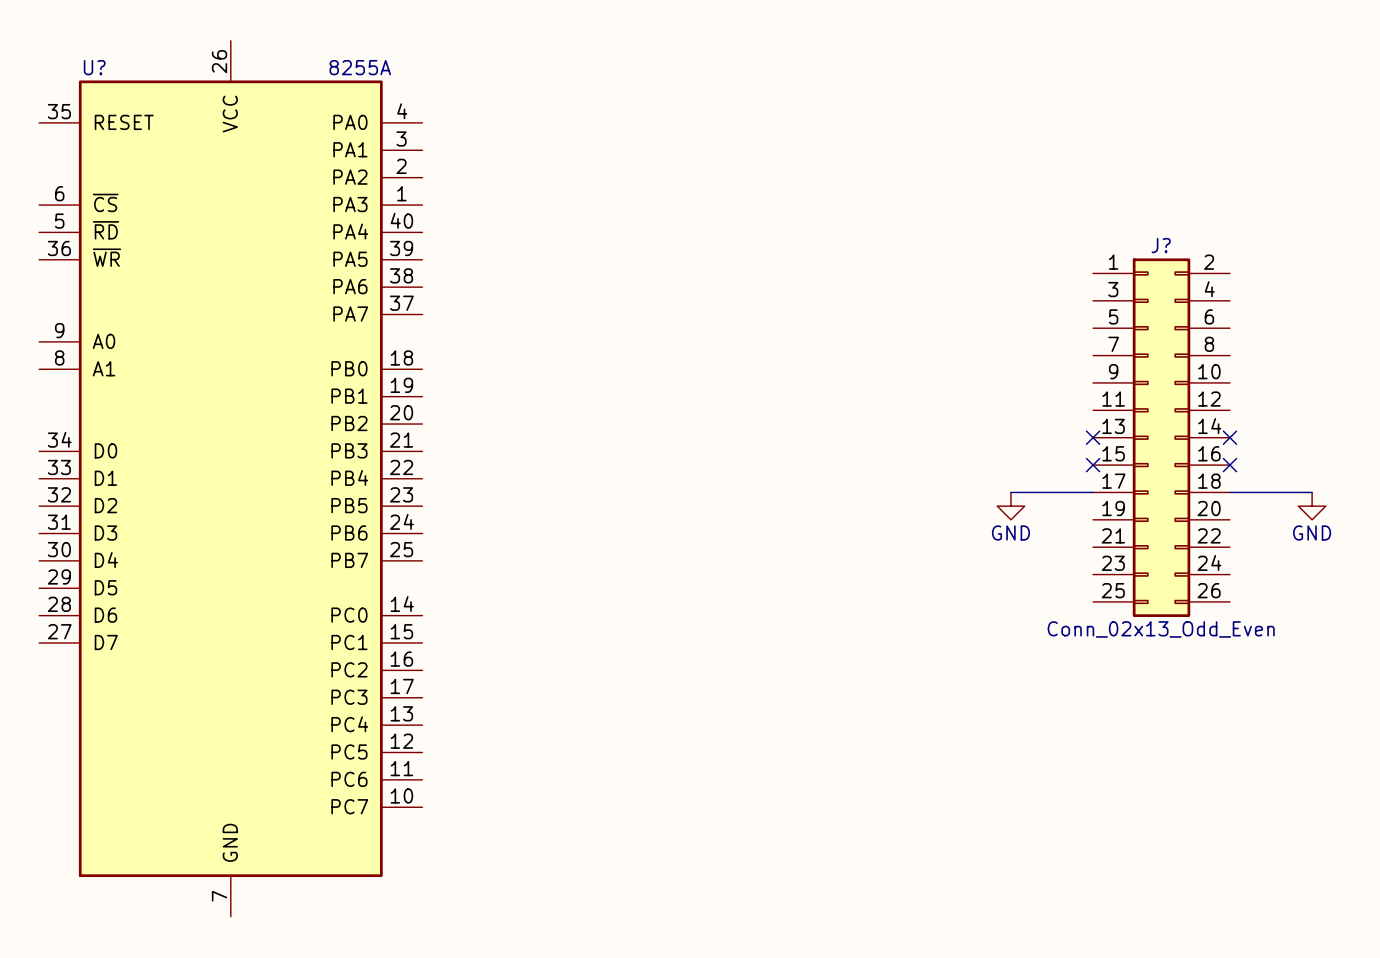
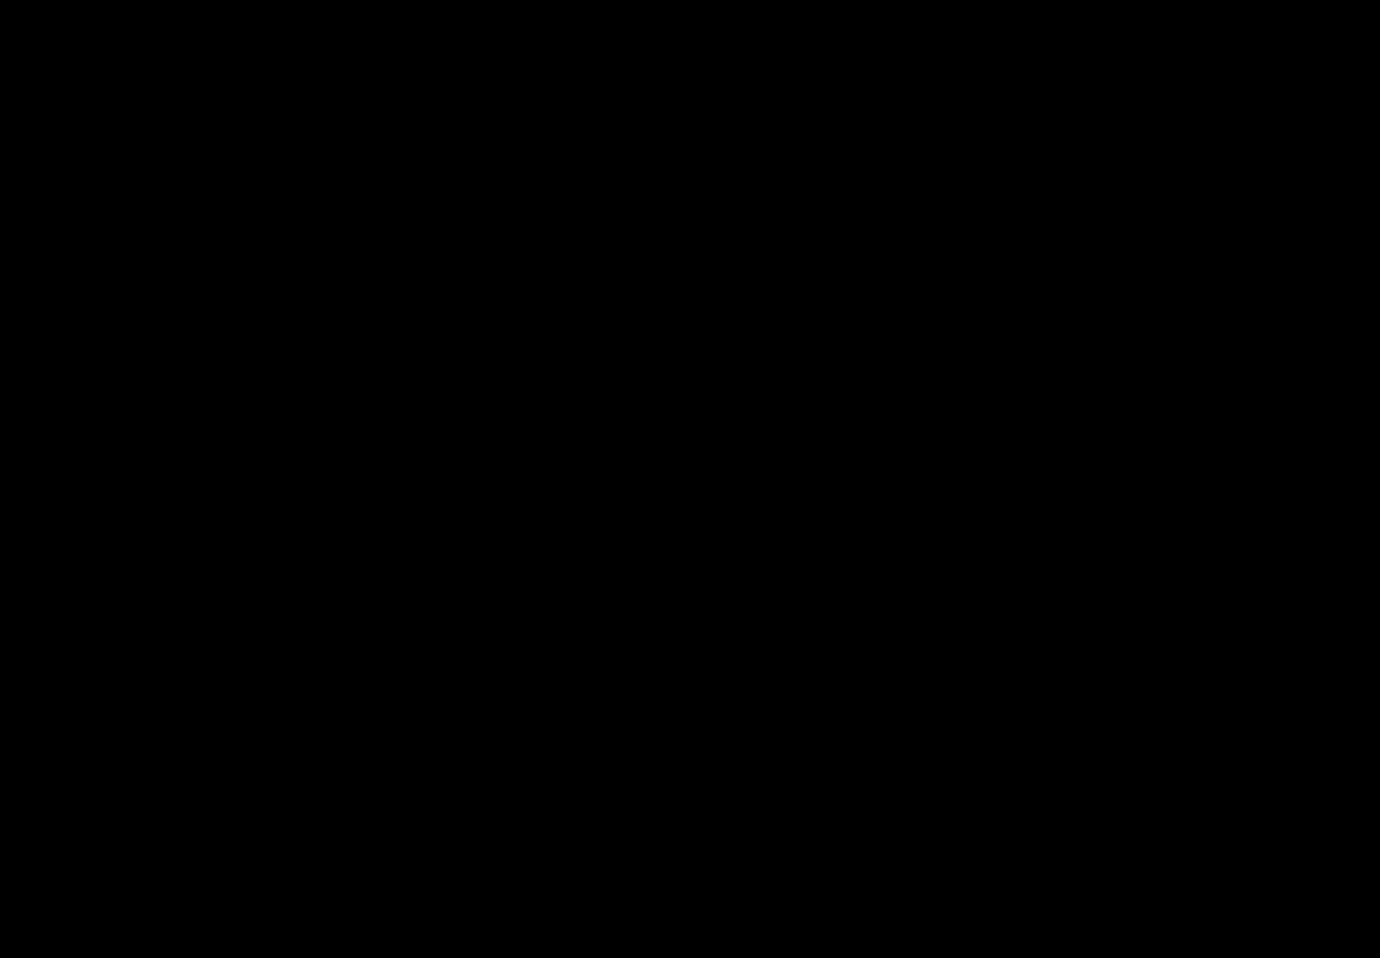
no-connect mark: (1093, 437) -> none
J?: Conn_02x13_Odd_Even (1161, 437) -> none
no-connect mark: (1229, 437) -> none
no-connect mark: (1093, 465) -> none
no-connect mark: (1229, 465) -> none
U?: 8255A (230, 478) -> none
wire: (1010, 492) (1093, 492) -> none
wire: (1229, 492) (1312, 492) -> none
power symbol: GND (1010, 506) -> none
power symbol: GND (1312, 506) -> none

